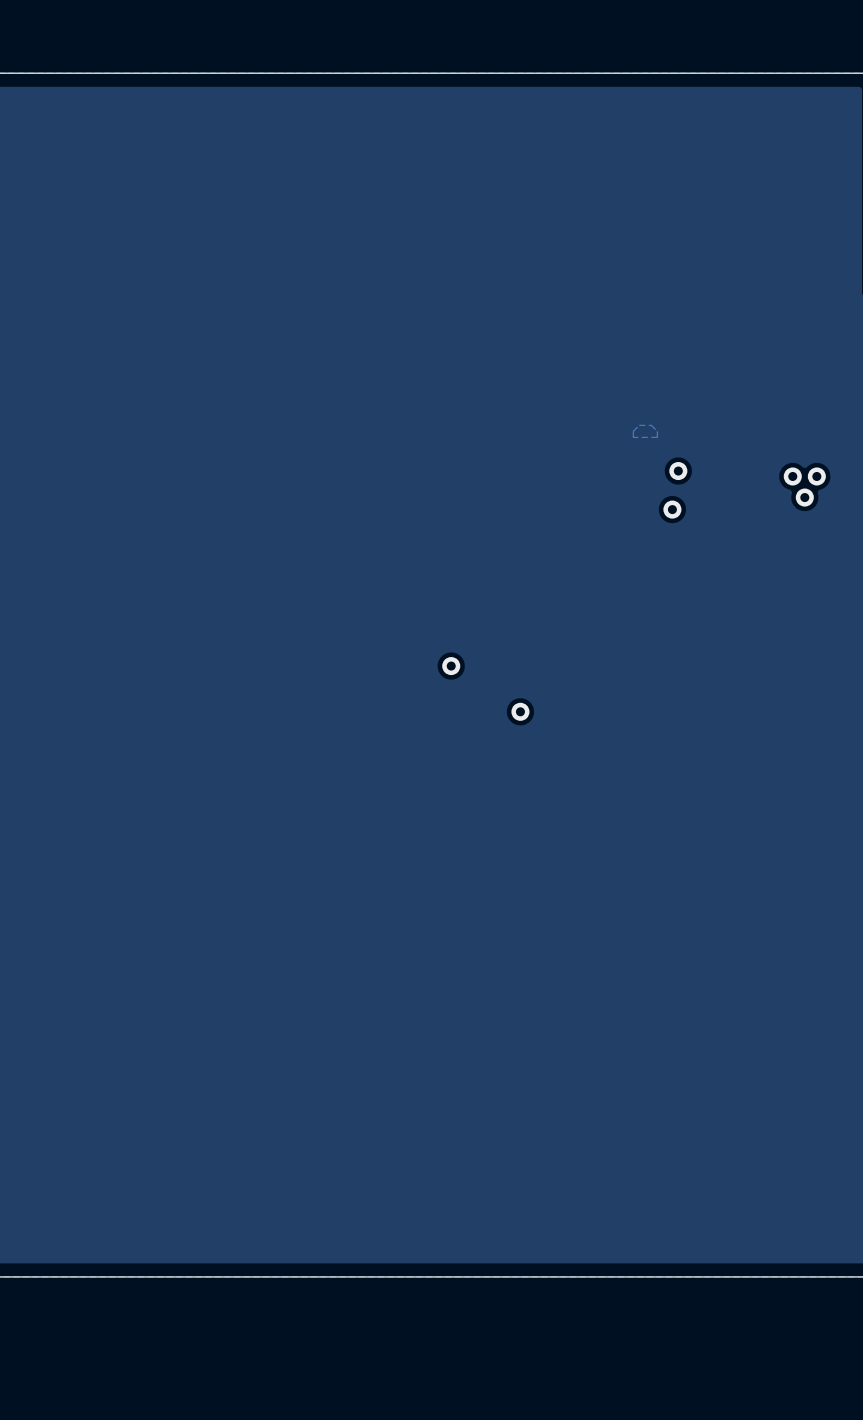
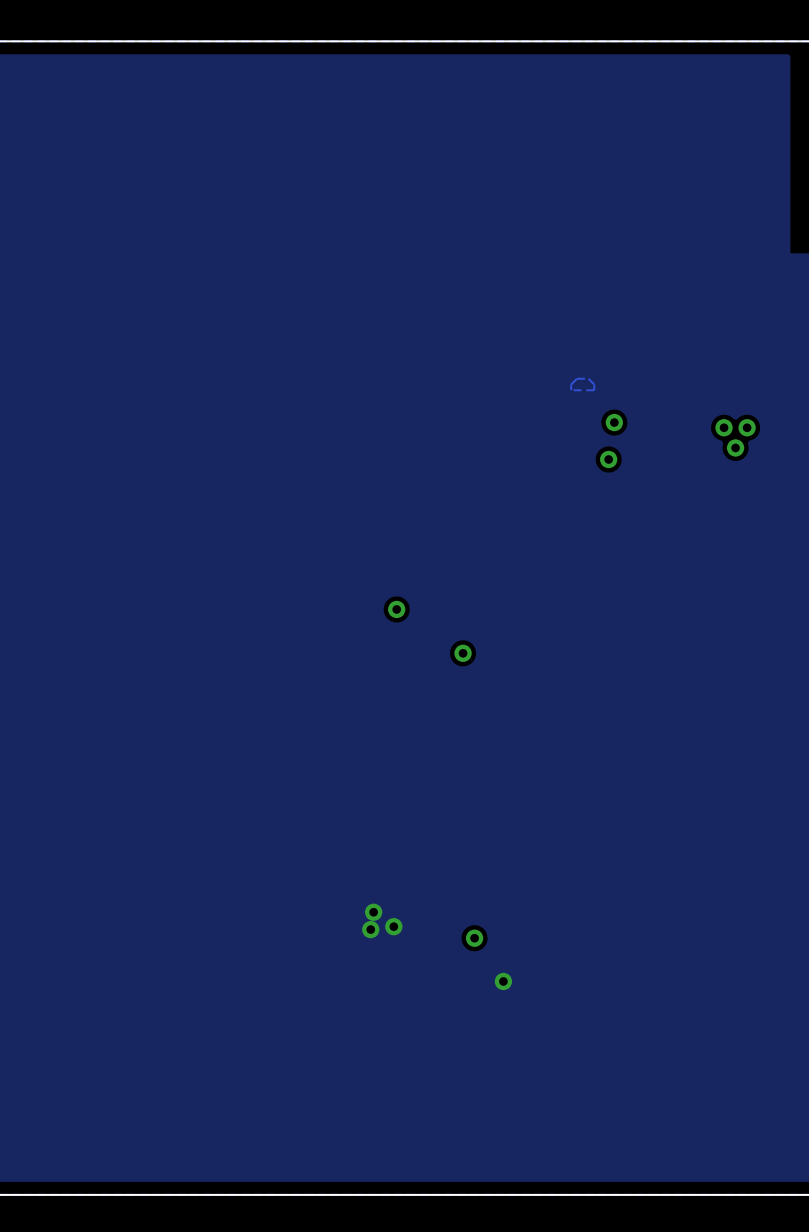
via: none -> (373, 912)
via: none -> (393, 926)
via: none -> (370, 929)
via: none -> (474, 938)
via: none -> (503, 981)

